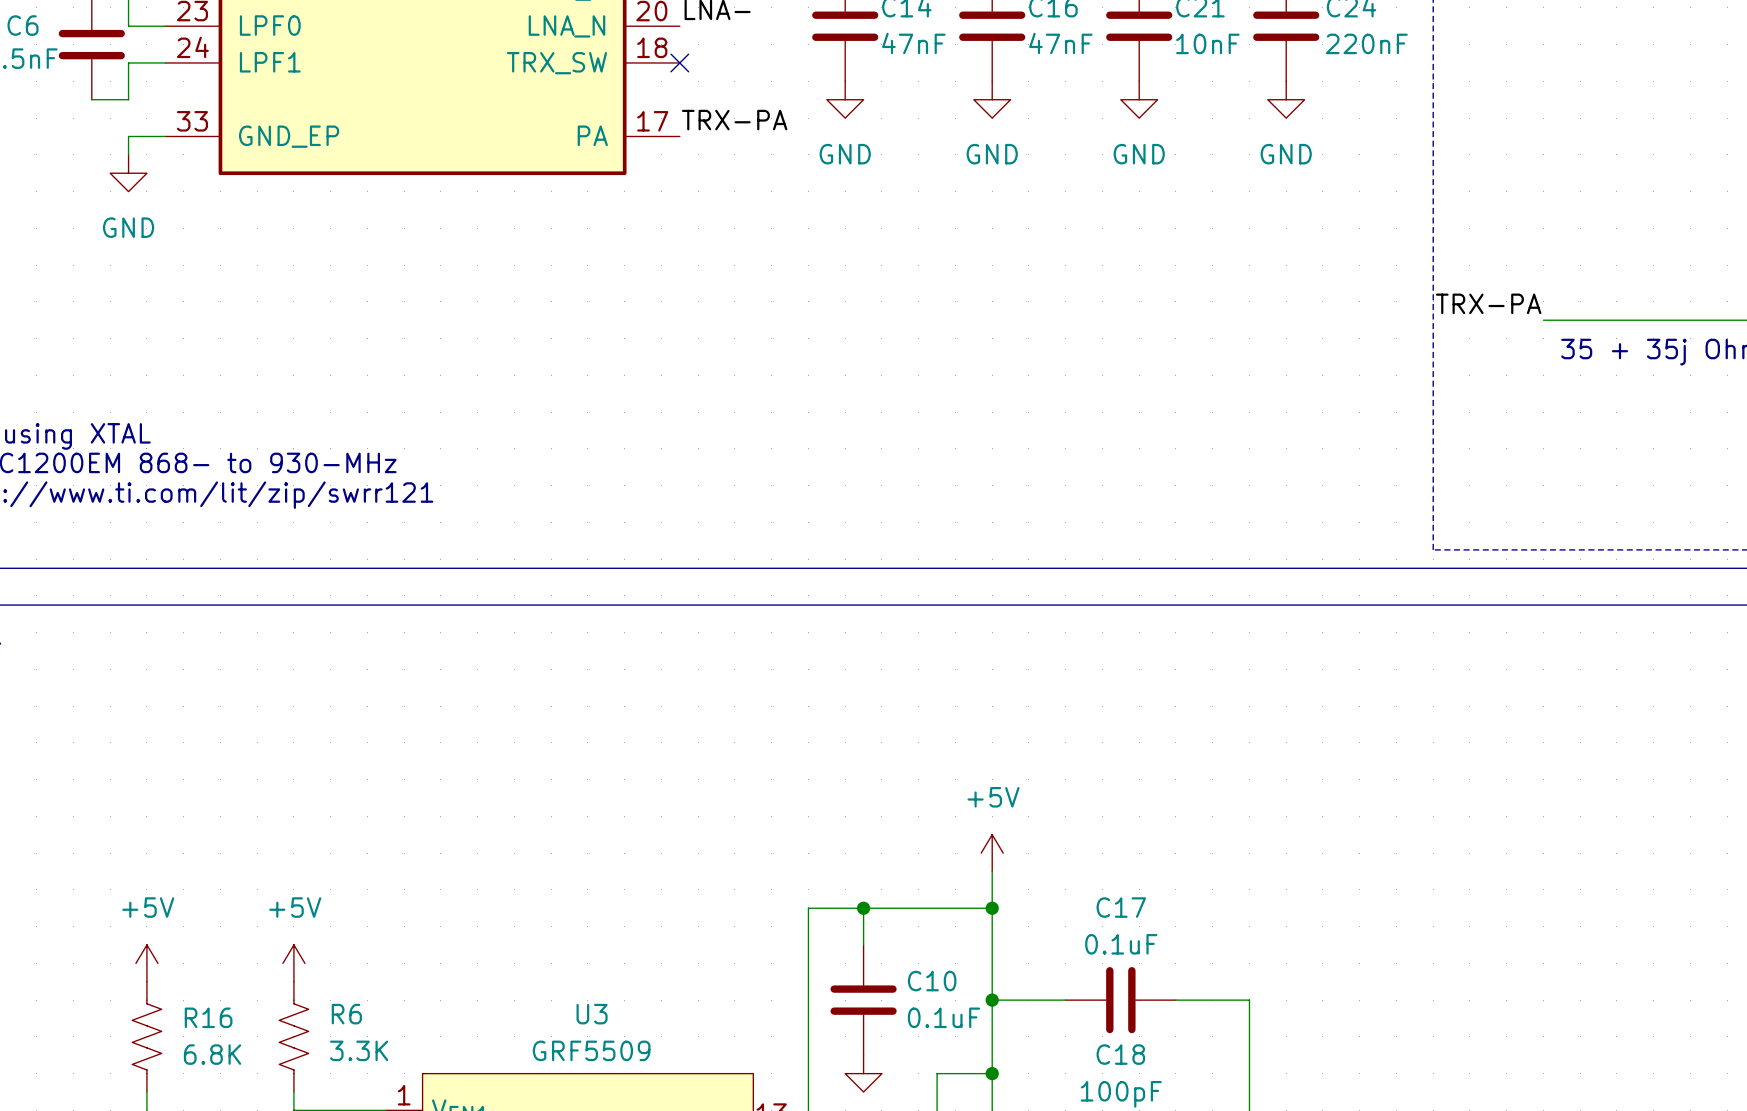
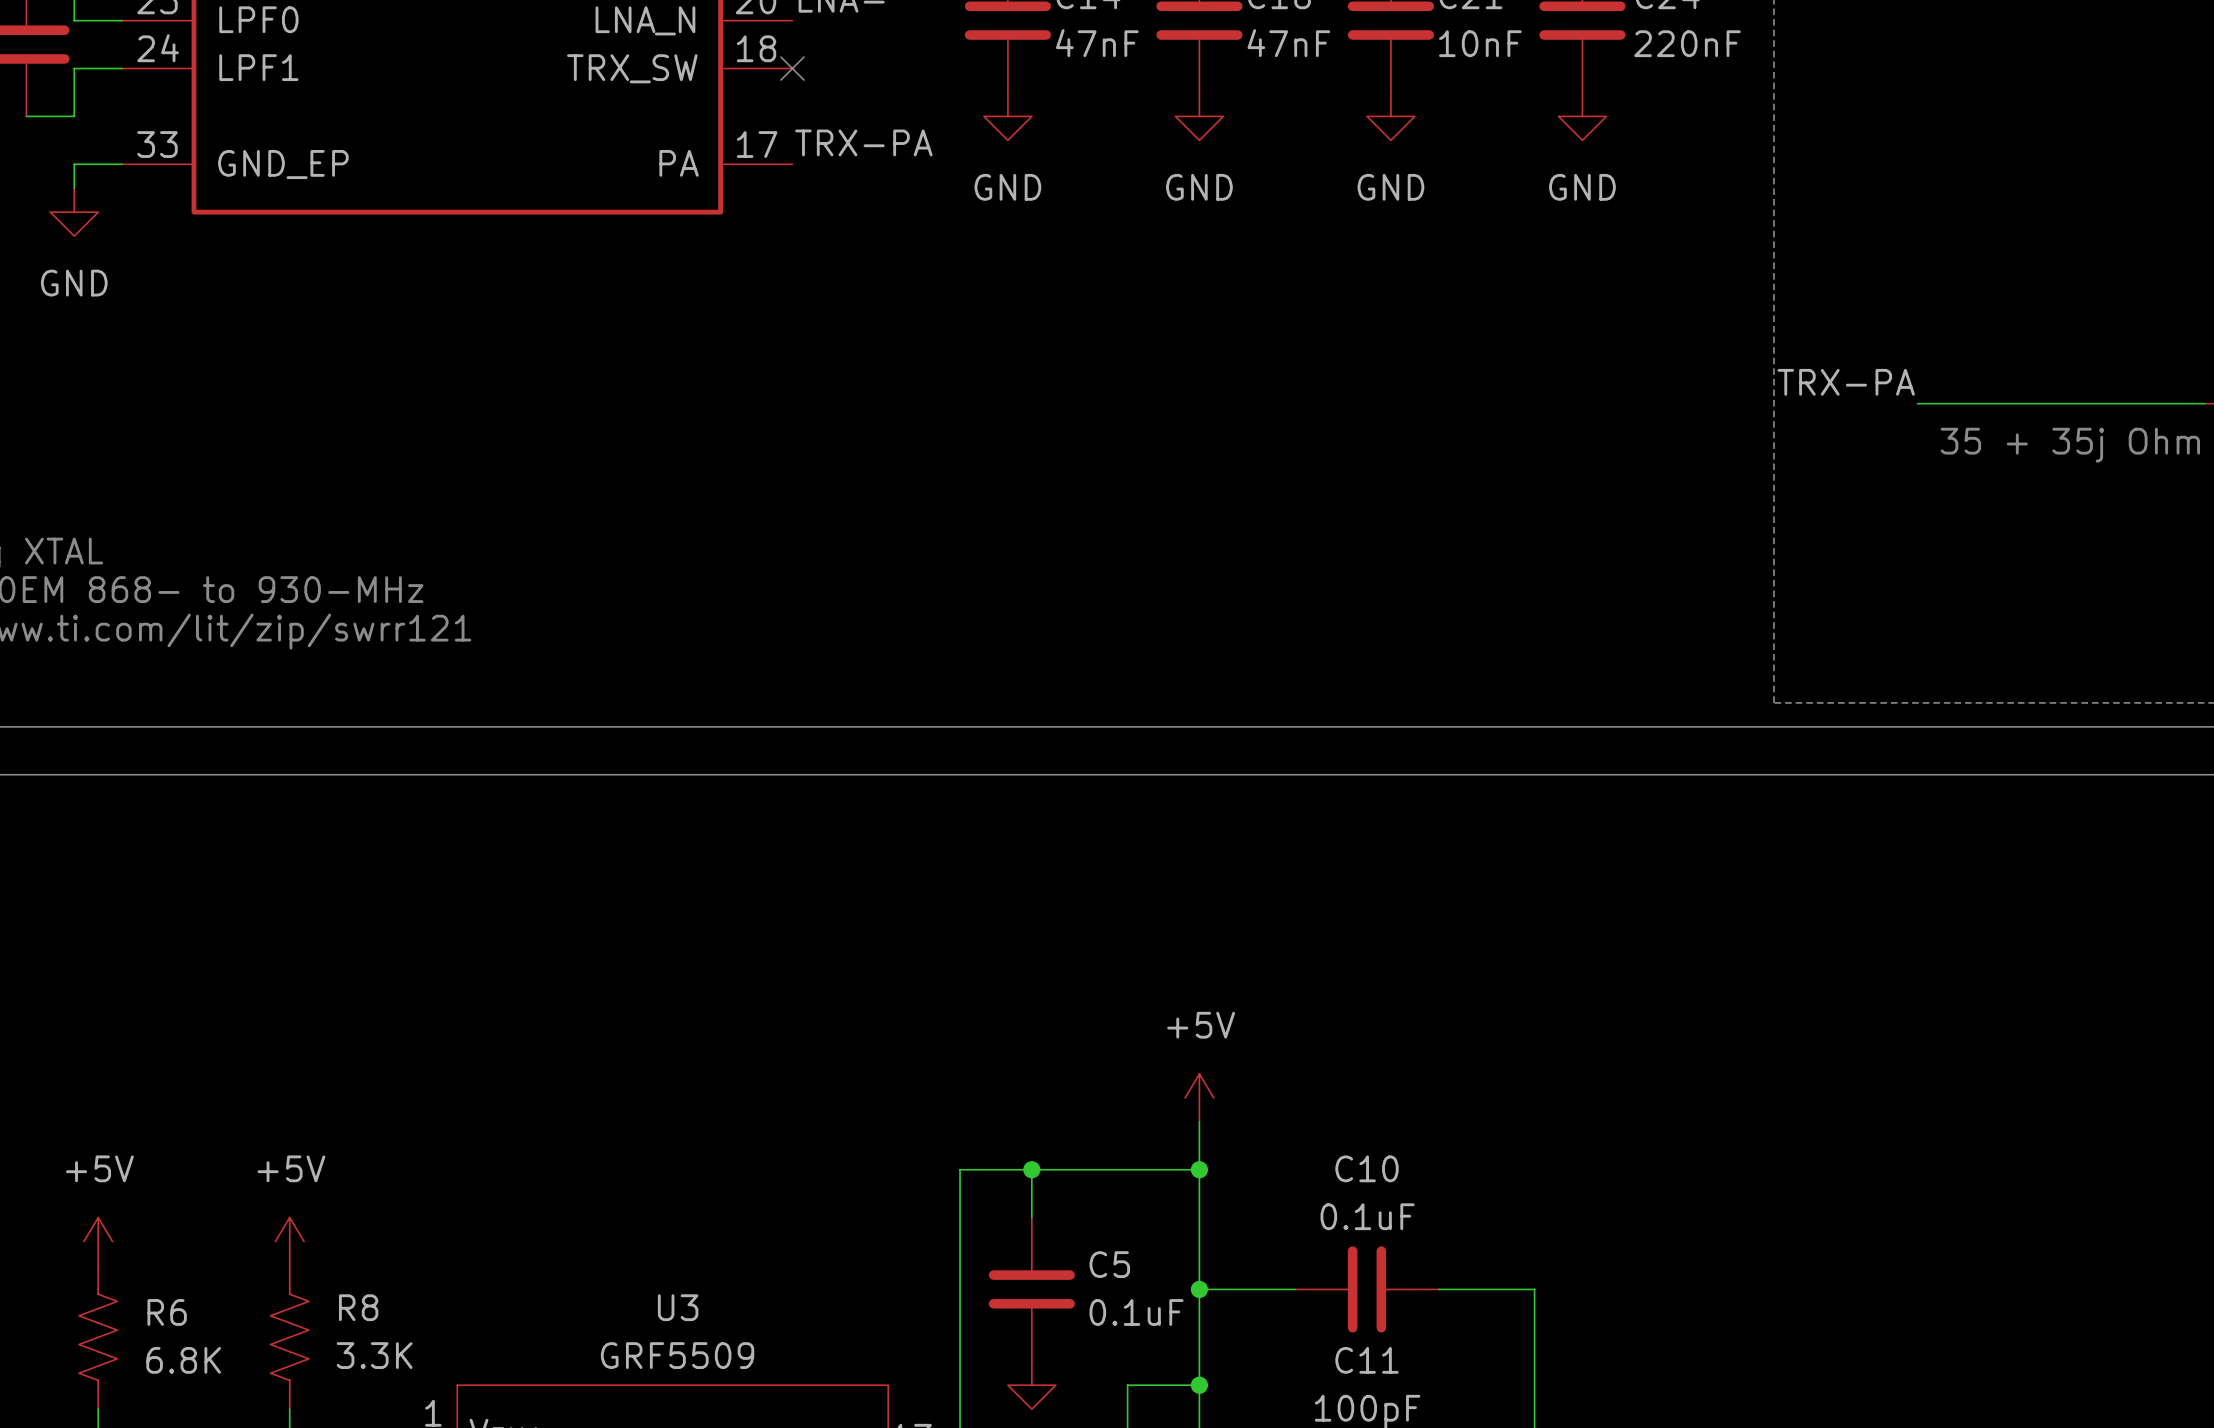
C17 name: C17 (1121, 907) -> C10 (1367, 1168)
C10 name: C10 (932, 981) -> C5 (1109, 1264)
R6 name: R6 (346, 1014) -> R8 (358, 1307)
R16 name: R16 (208, 1017) -> R6 (167, 1312)
C18 name: C18 (1120, 1054) -> C11 (1367, 1360)

